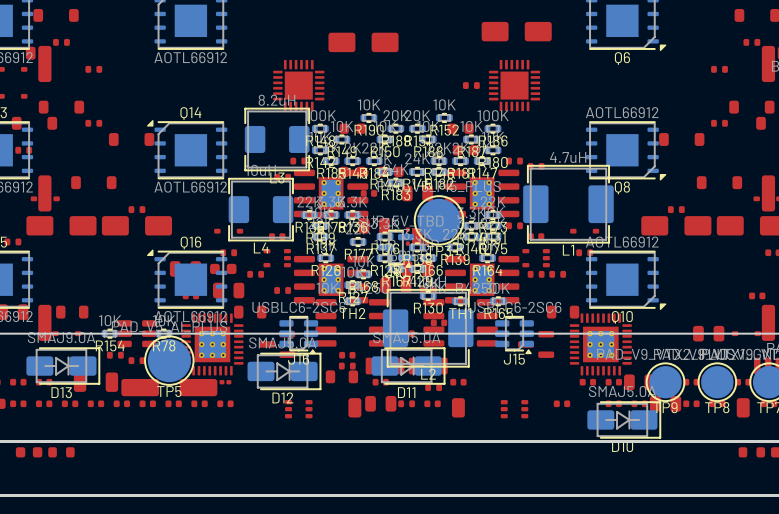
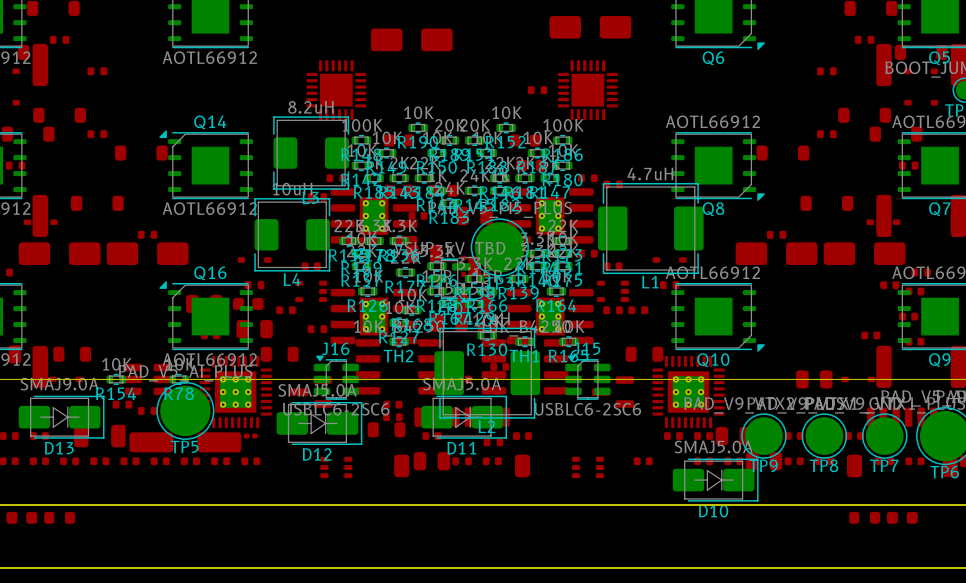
J16 side: bottom (298, 335) -> top (336, 377)
J15 side: bottom (514, 335) -> top (587, 377)

